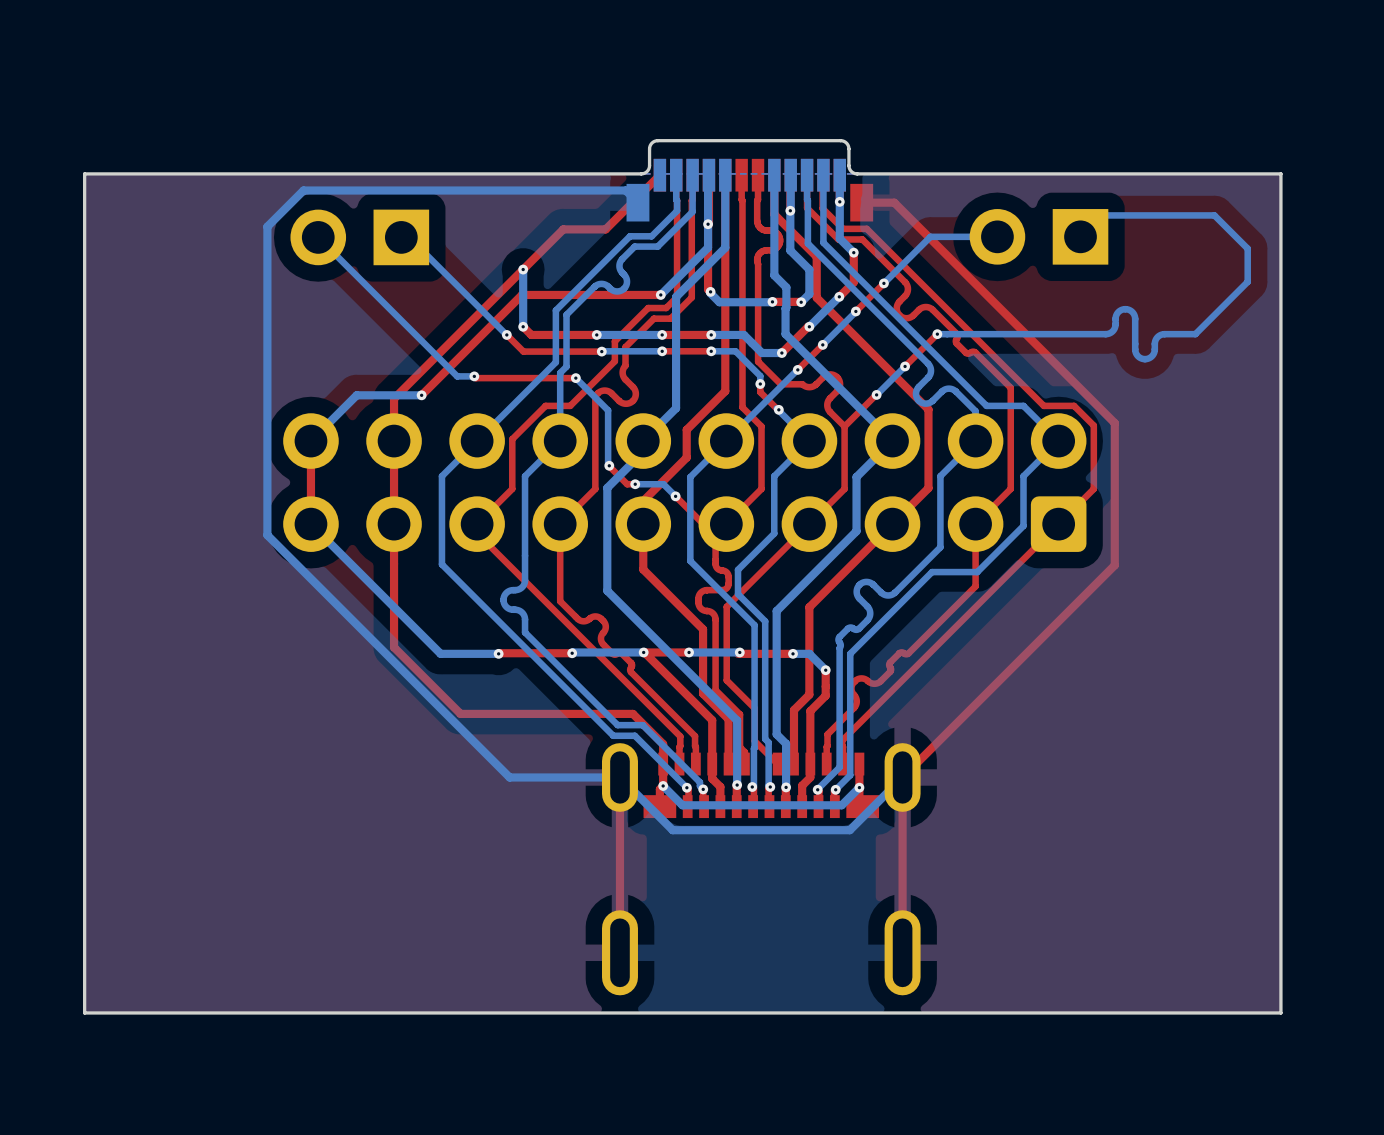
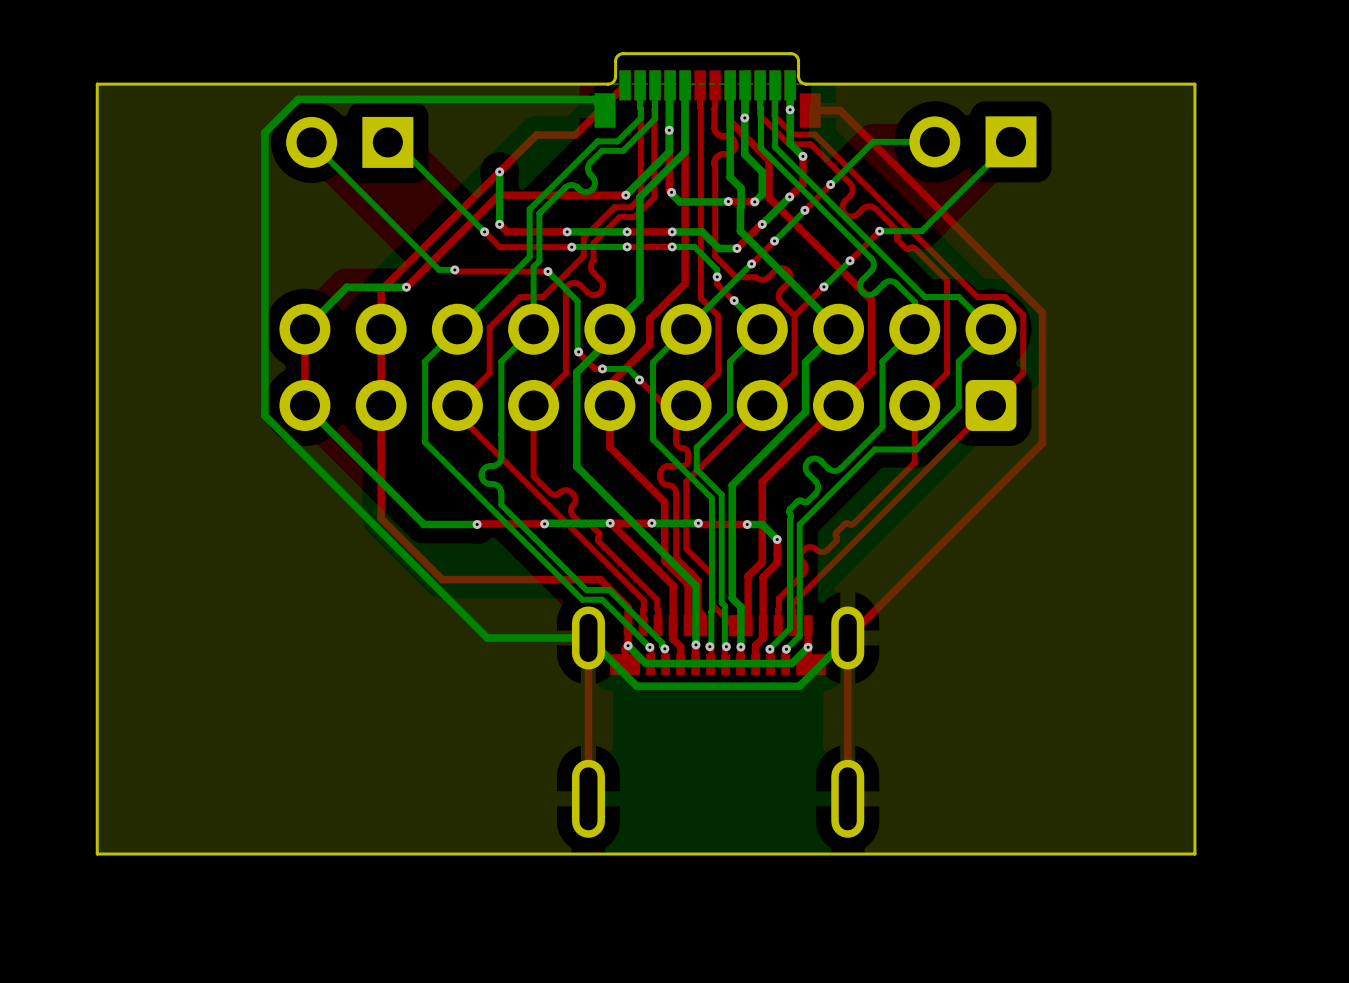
bottom track: (1080, 236) (1101, 215) (1214, 215) (1247, 248) (1247, 281) (1195, 334) (1164, 334) (1158, 336) (1155, 341) (1153, 354) (1146, 359) (1140, 357) (1135, 353) (1134, 316) (1131, 311) (1126, 309) (1117, 313) (1114, 329) (1107, 334) (983, 334) -> (1011, 141) (921, 231)

